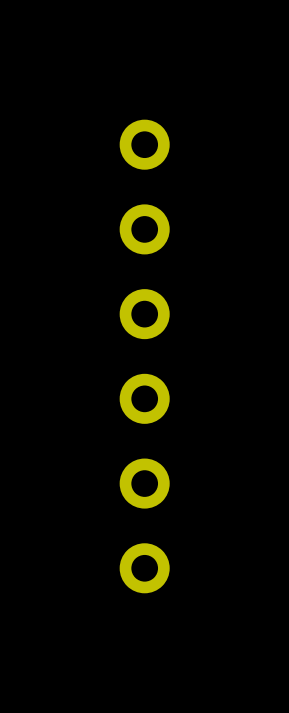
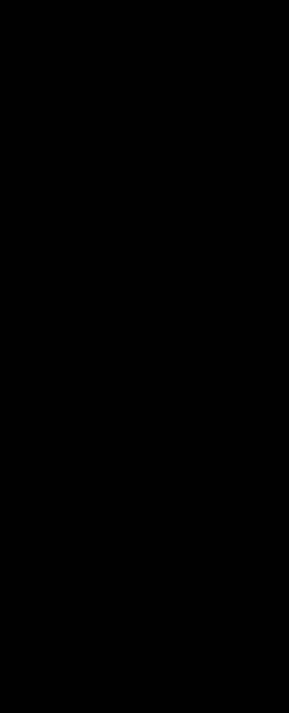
part: (144, 356) -> none

